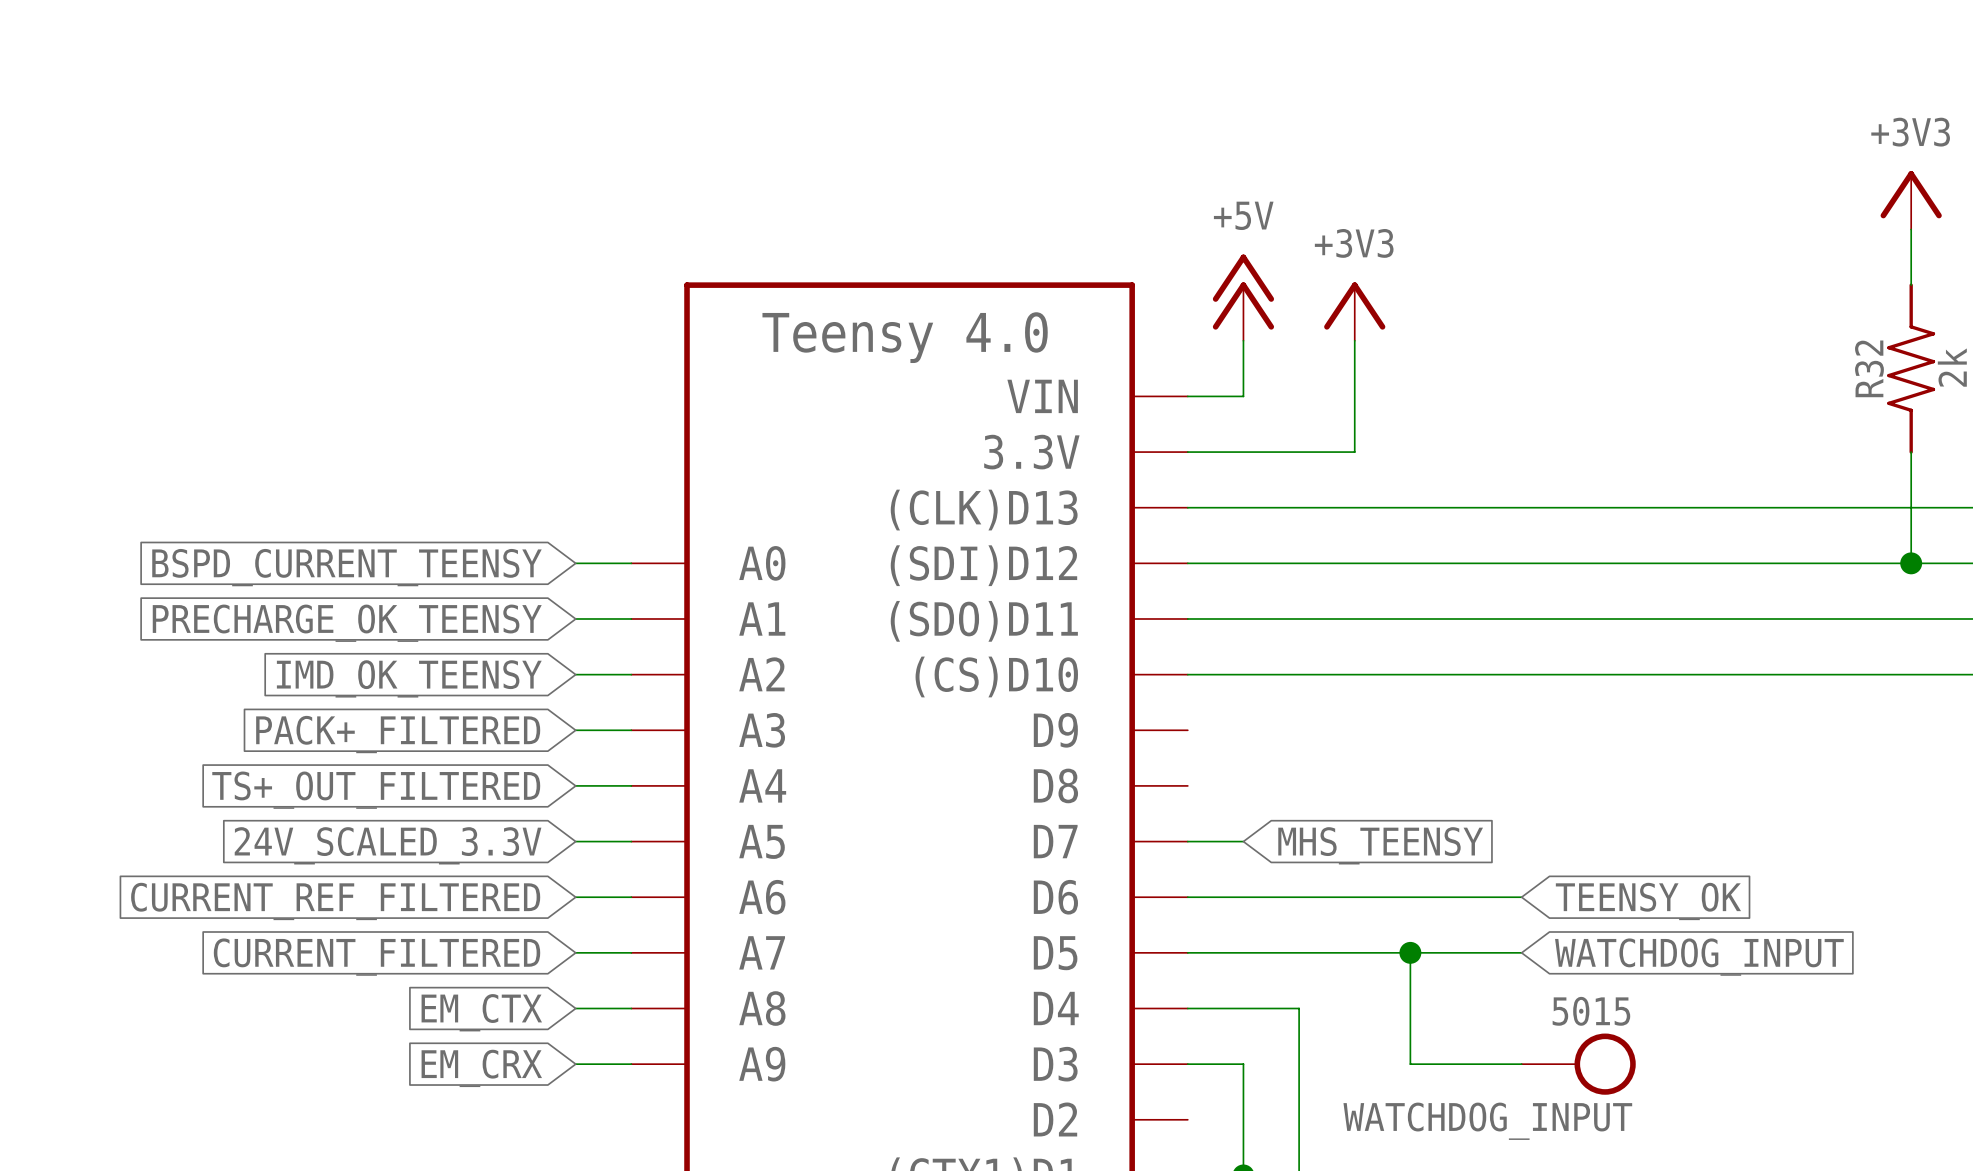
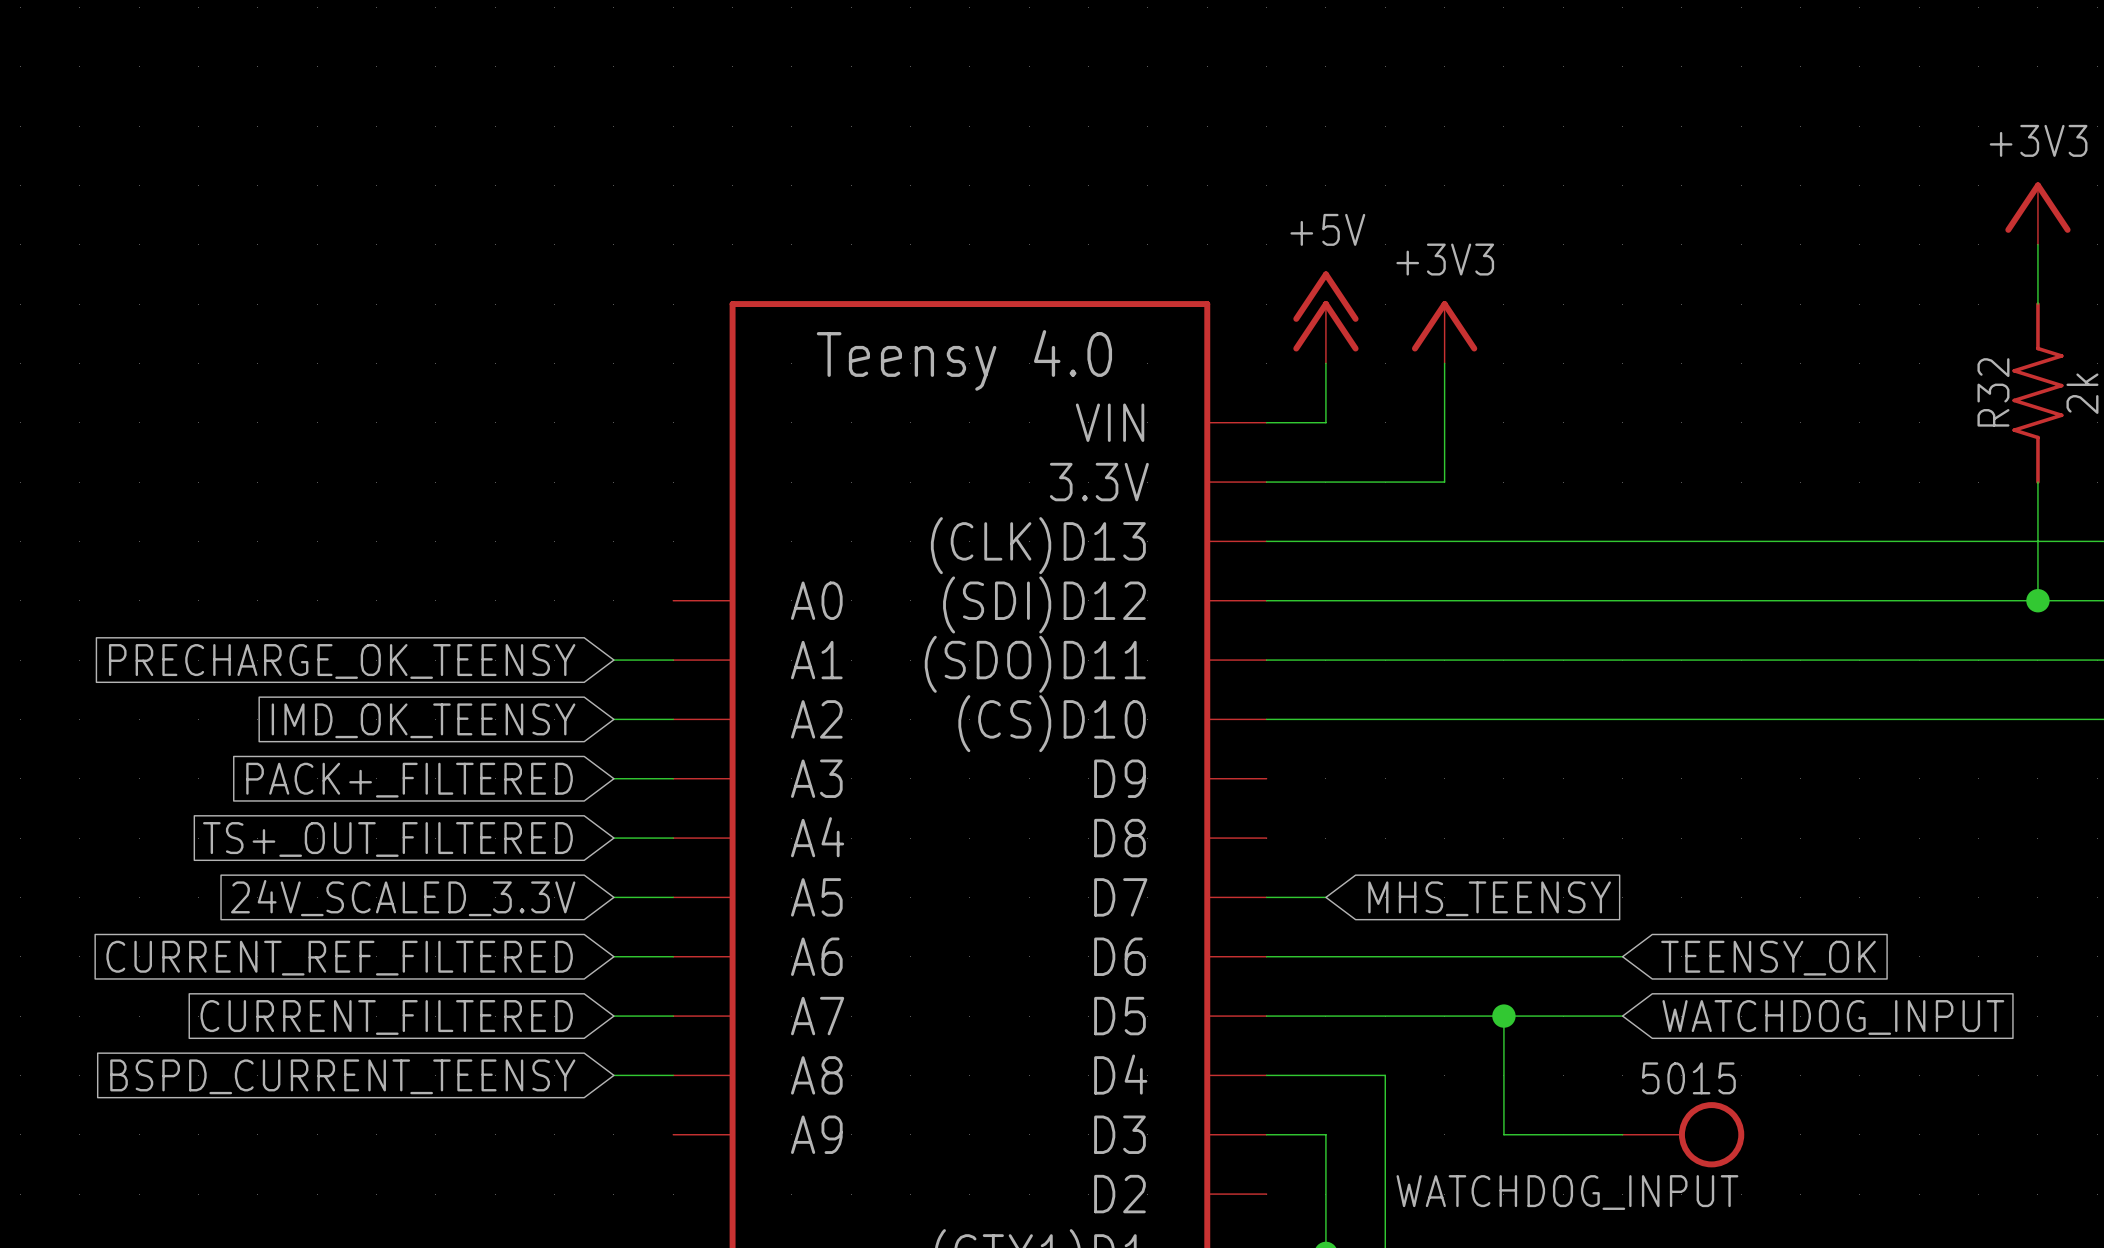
wire: (575, 563) (631, 563) -> none
global label: BSPD_CURRENT_TEENSY (346, 567) -> none
global label: EM_CTX (481, 1012) -> BSPD_CURRENT_TEENSY (342, 1076)
wire: (575, 1064) (631, 1064) -> none
global label: EM_CRX (481, 1068) -> none

